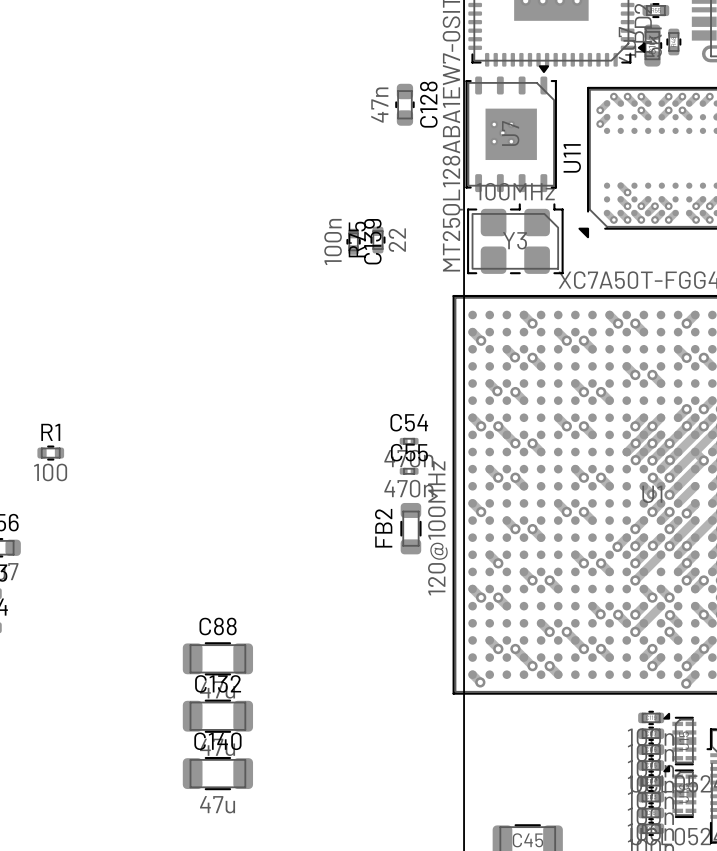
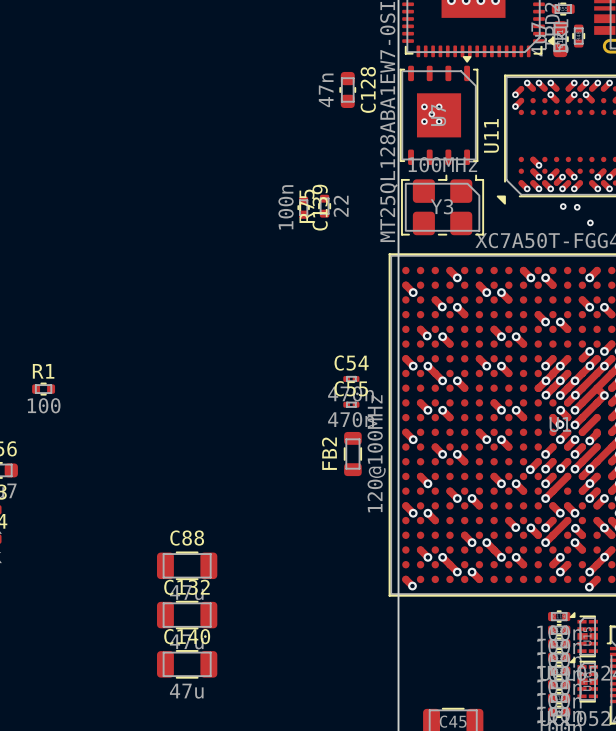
via: none -> (563, 206)
via: none -> (577, 207)
via: none -> (590, 222)

